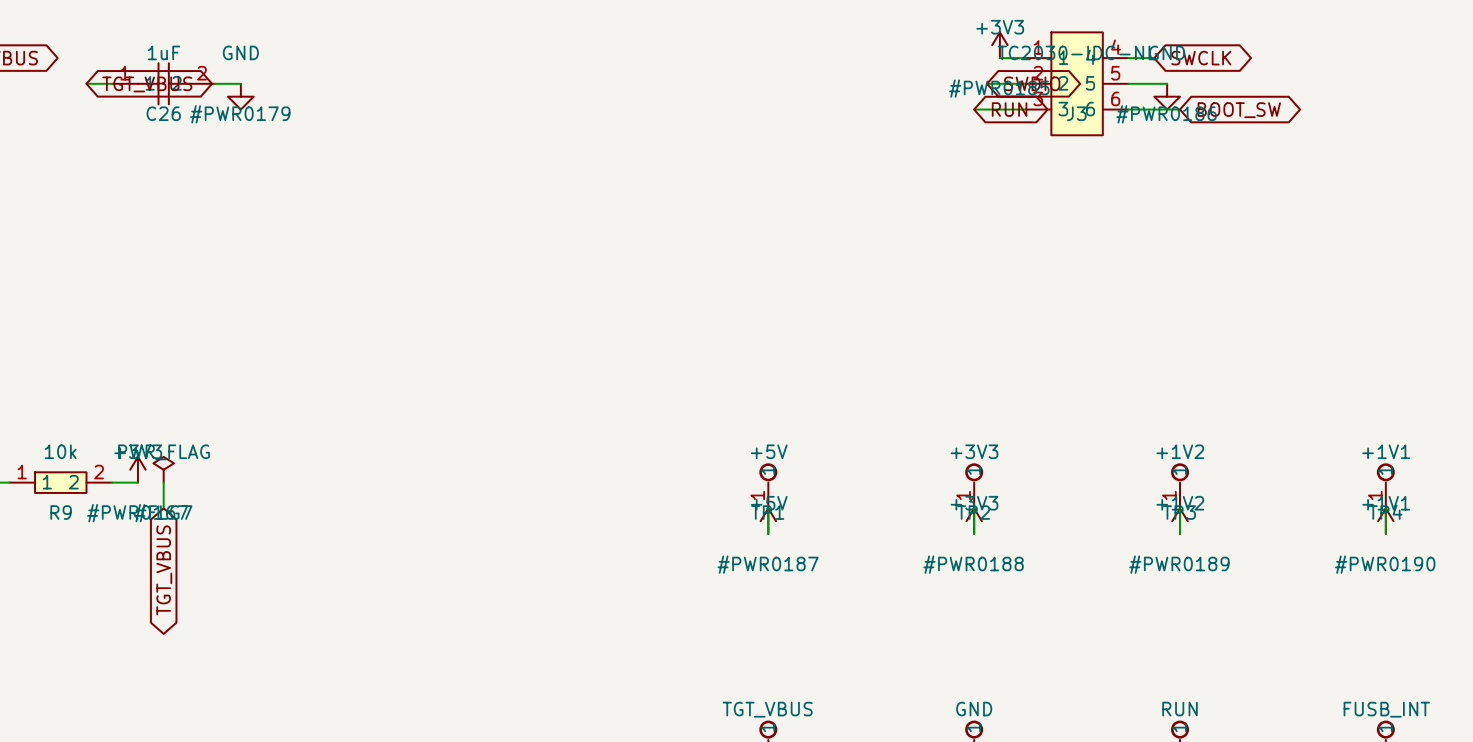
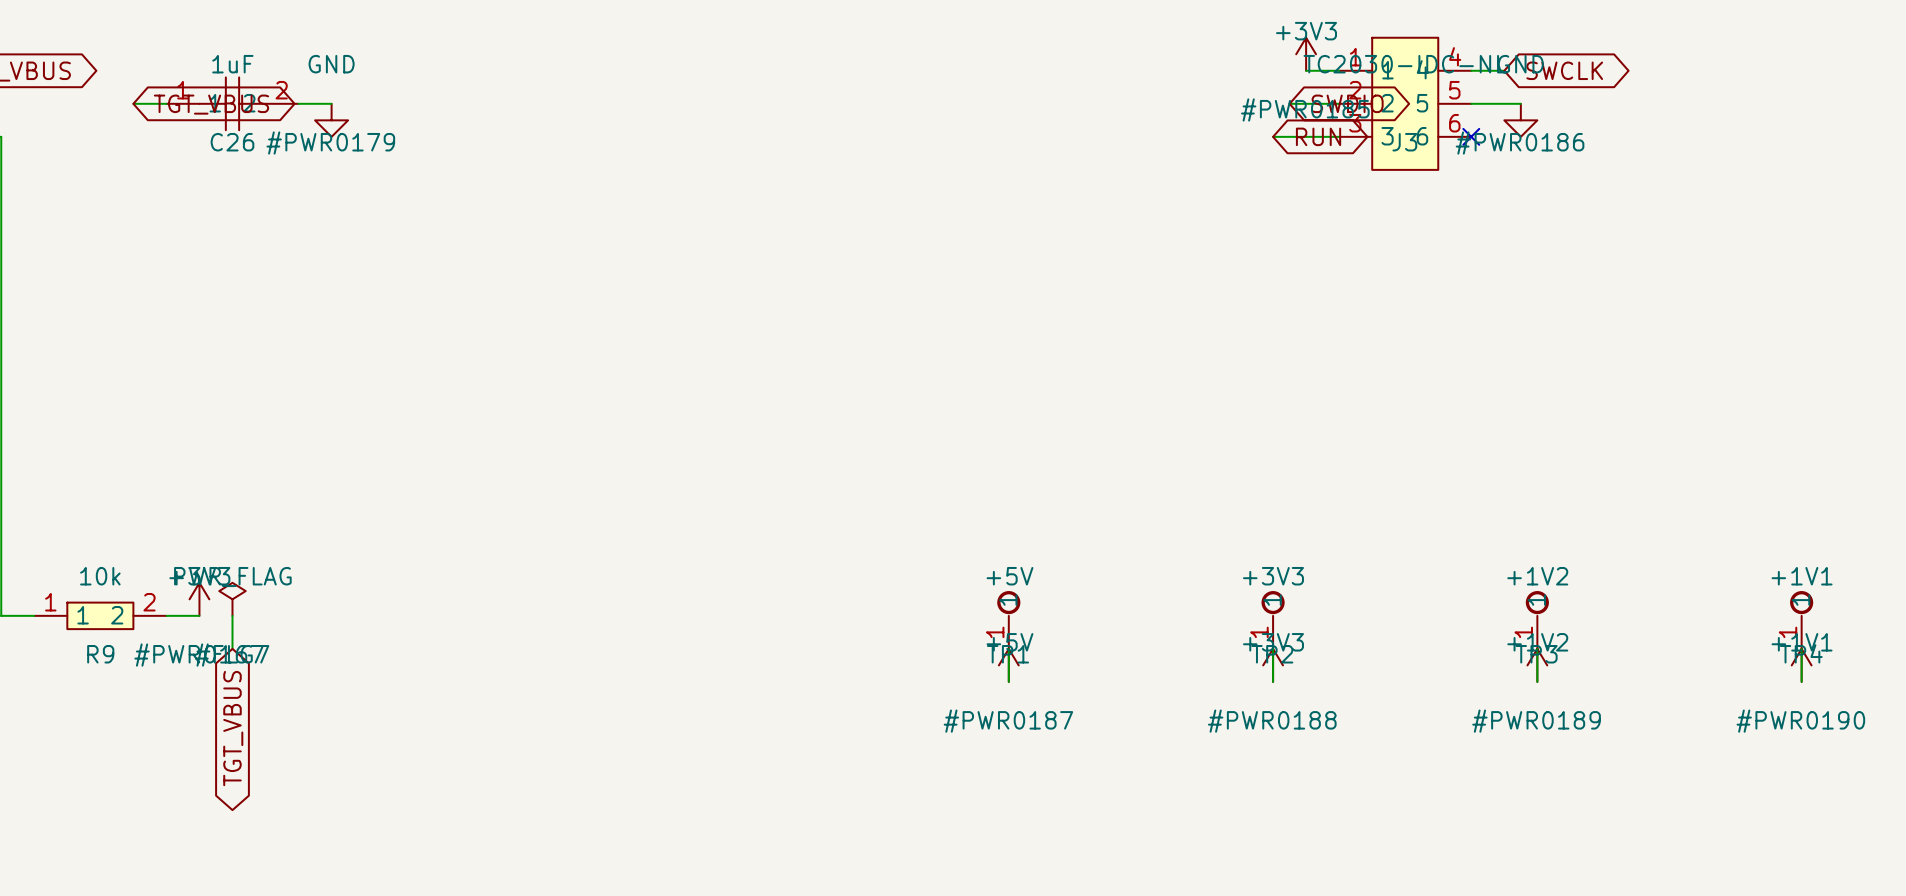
wire: (1128, 109) (1180, 109) -> none
no-connect mark: none -> (1471, 136)
global label: BOOT_SW (1239, 110) -> none

